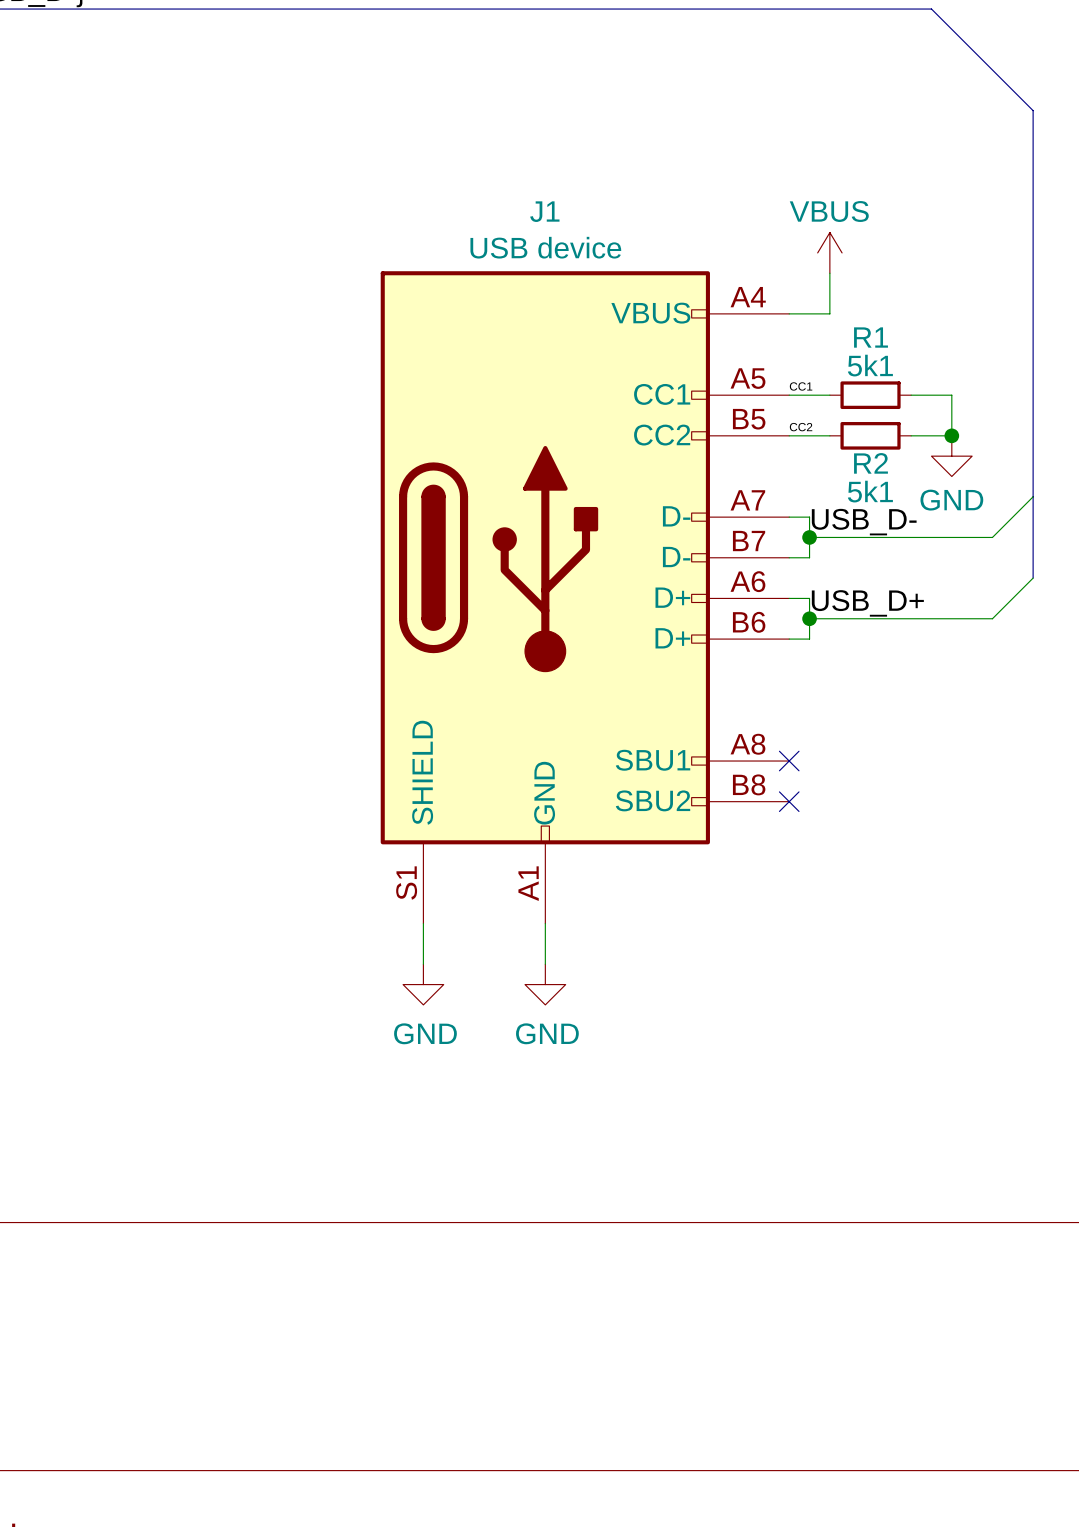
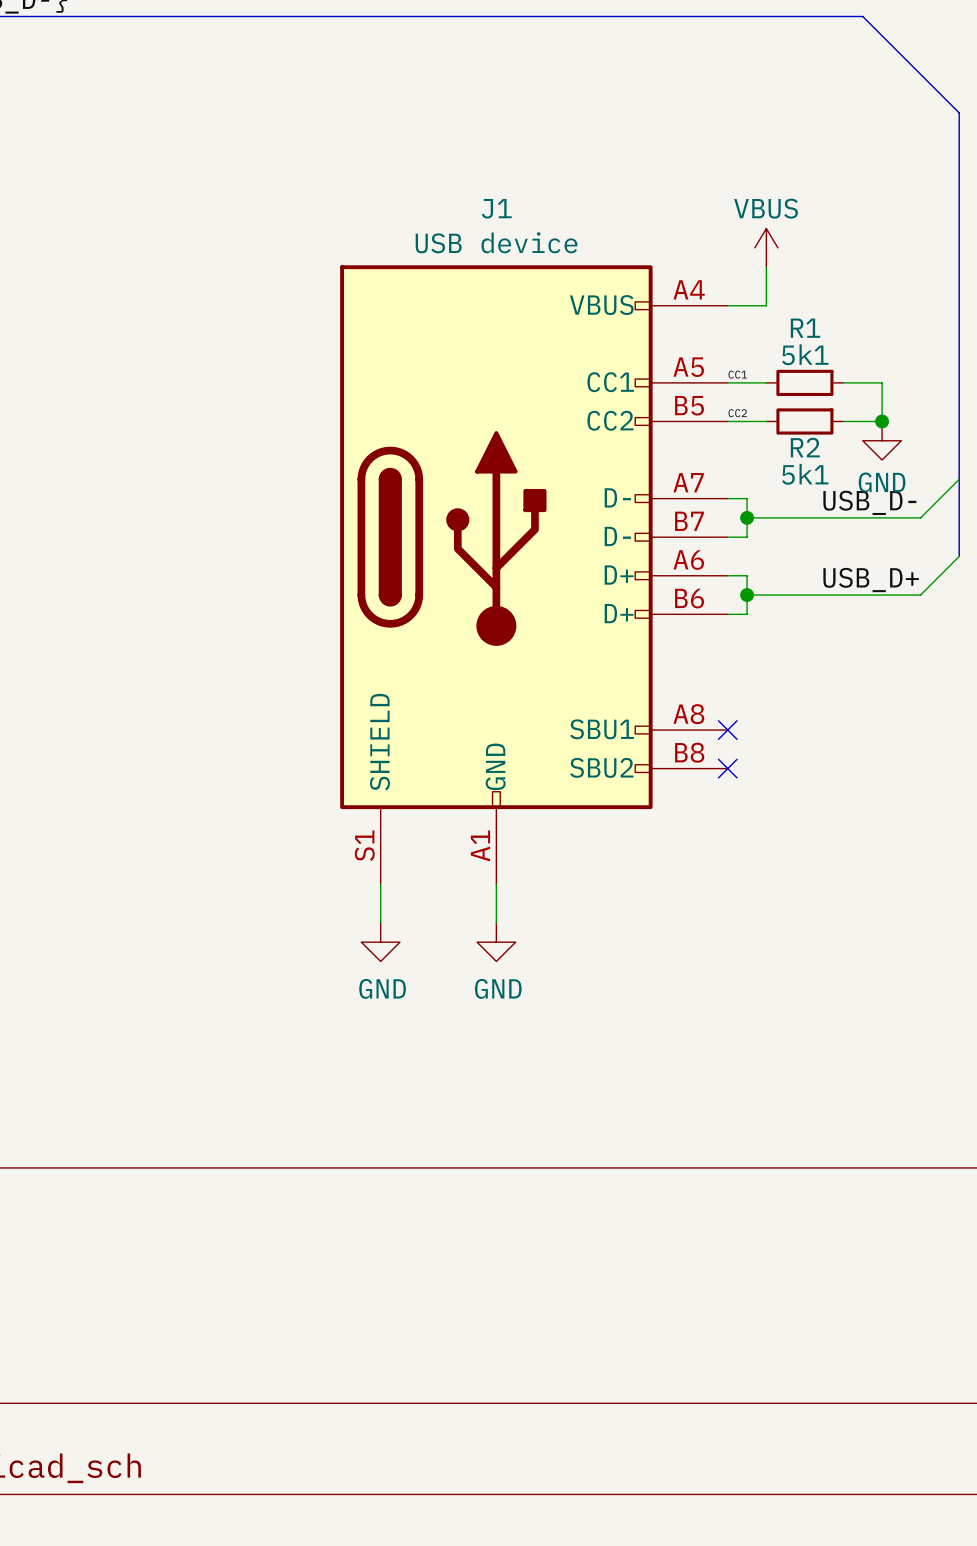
label position: USB_D- (864, 522) -> USB_D- (869, 502)
label position: USB_D+ (867, 603) -> USB_D+ (871, 580)

